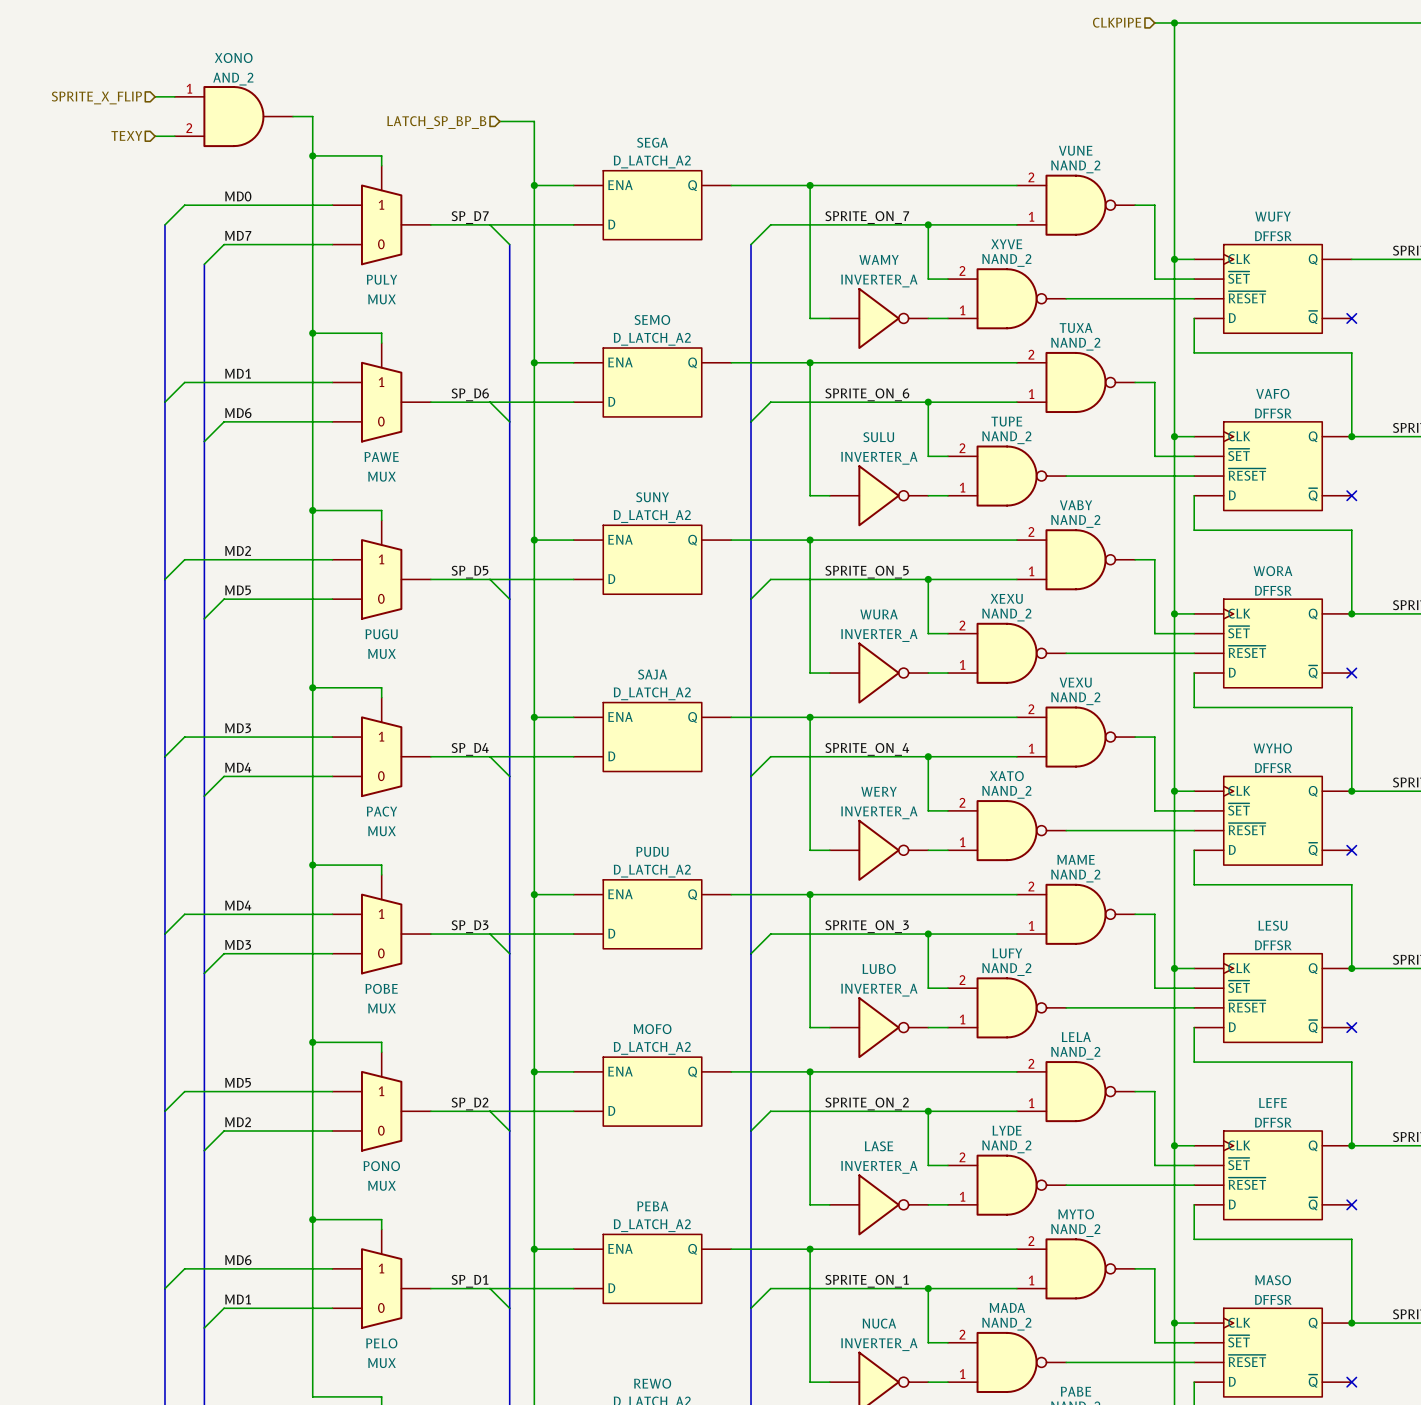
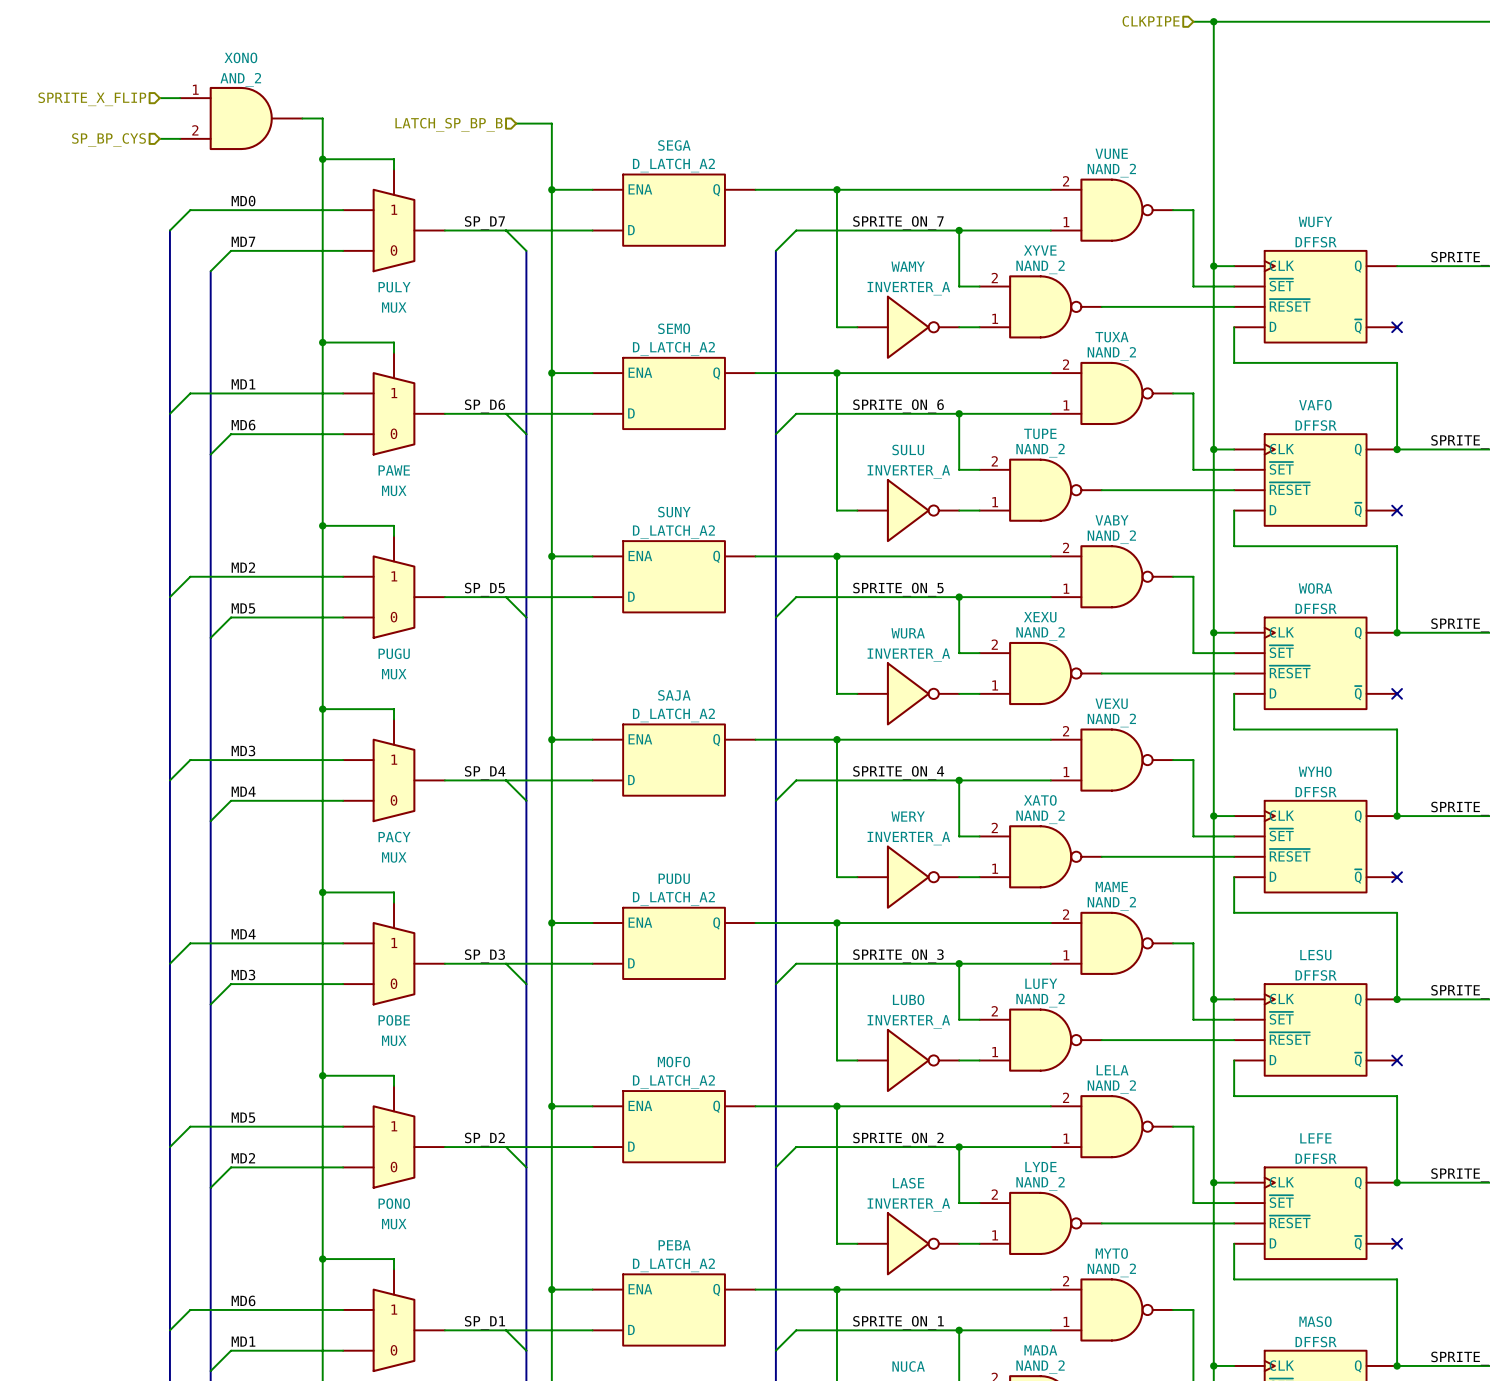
hierarchical label: TEXY (126, 135) -> SP_BP_CYS (109, 140)

